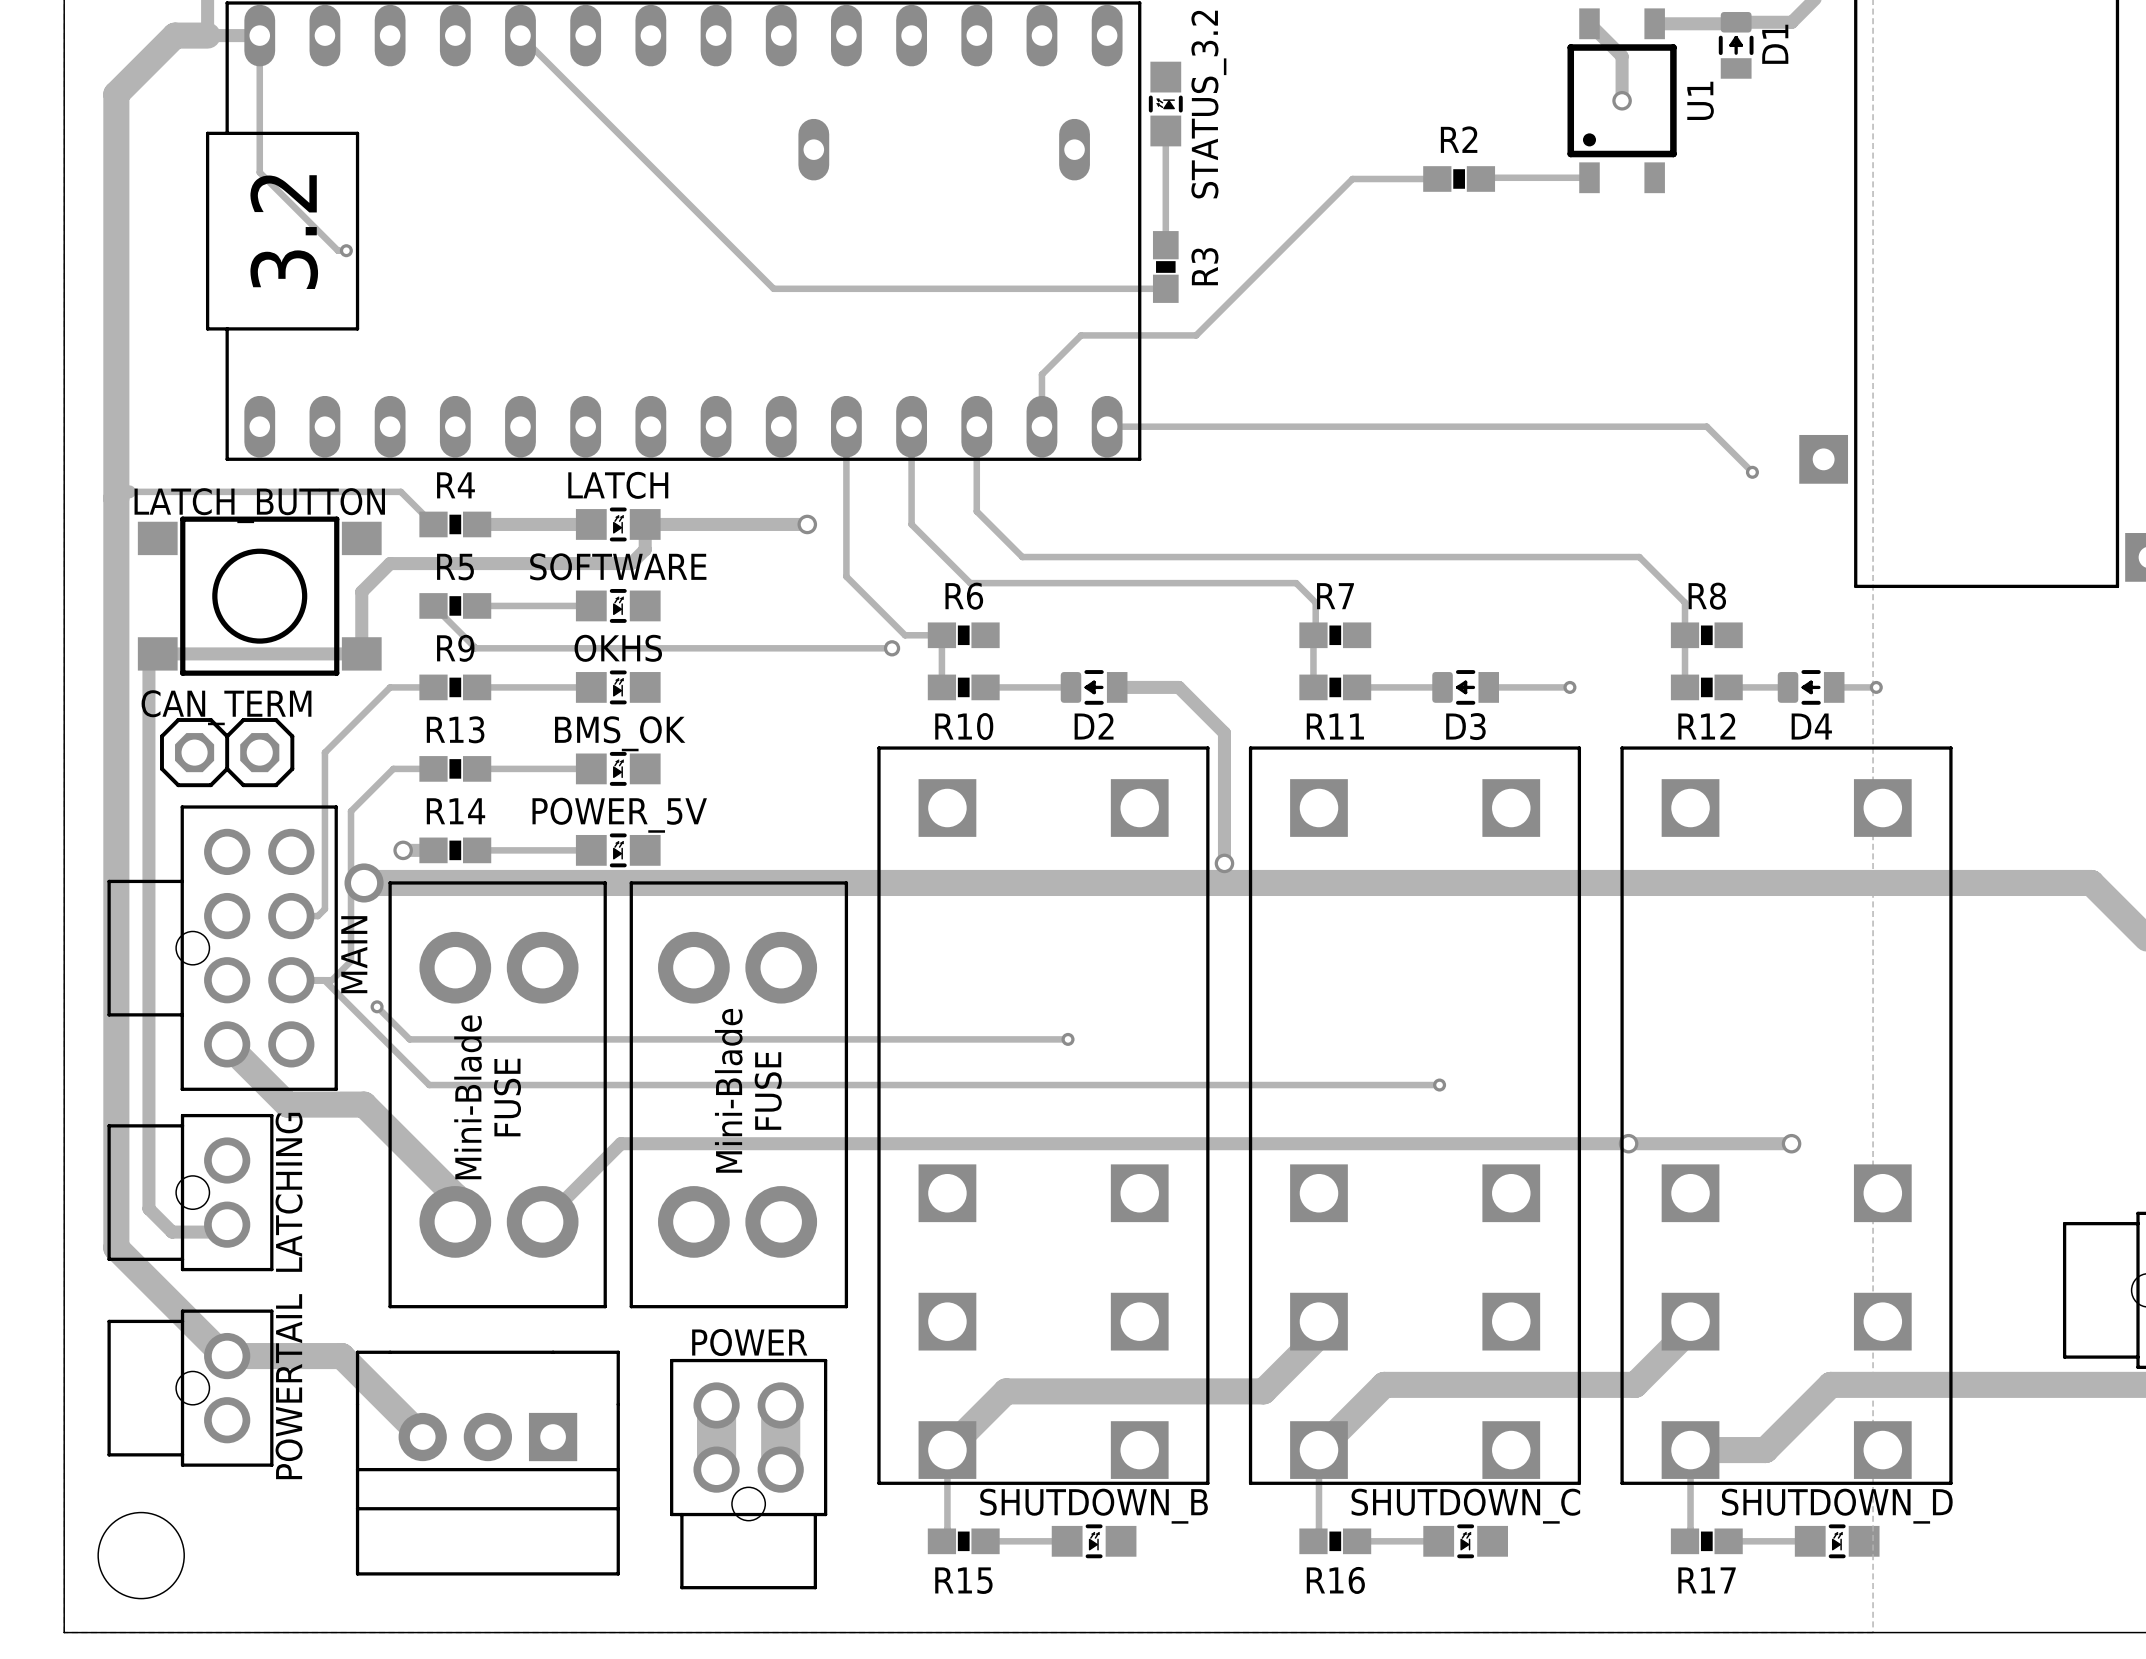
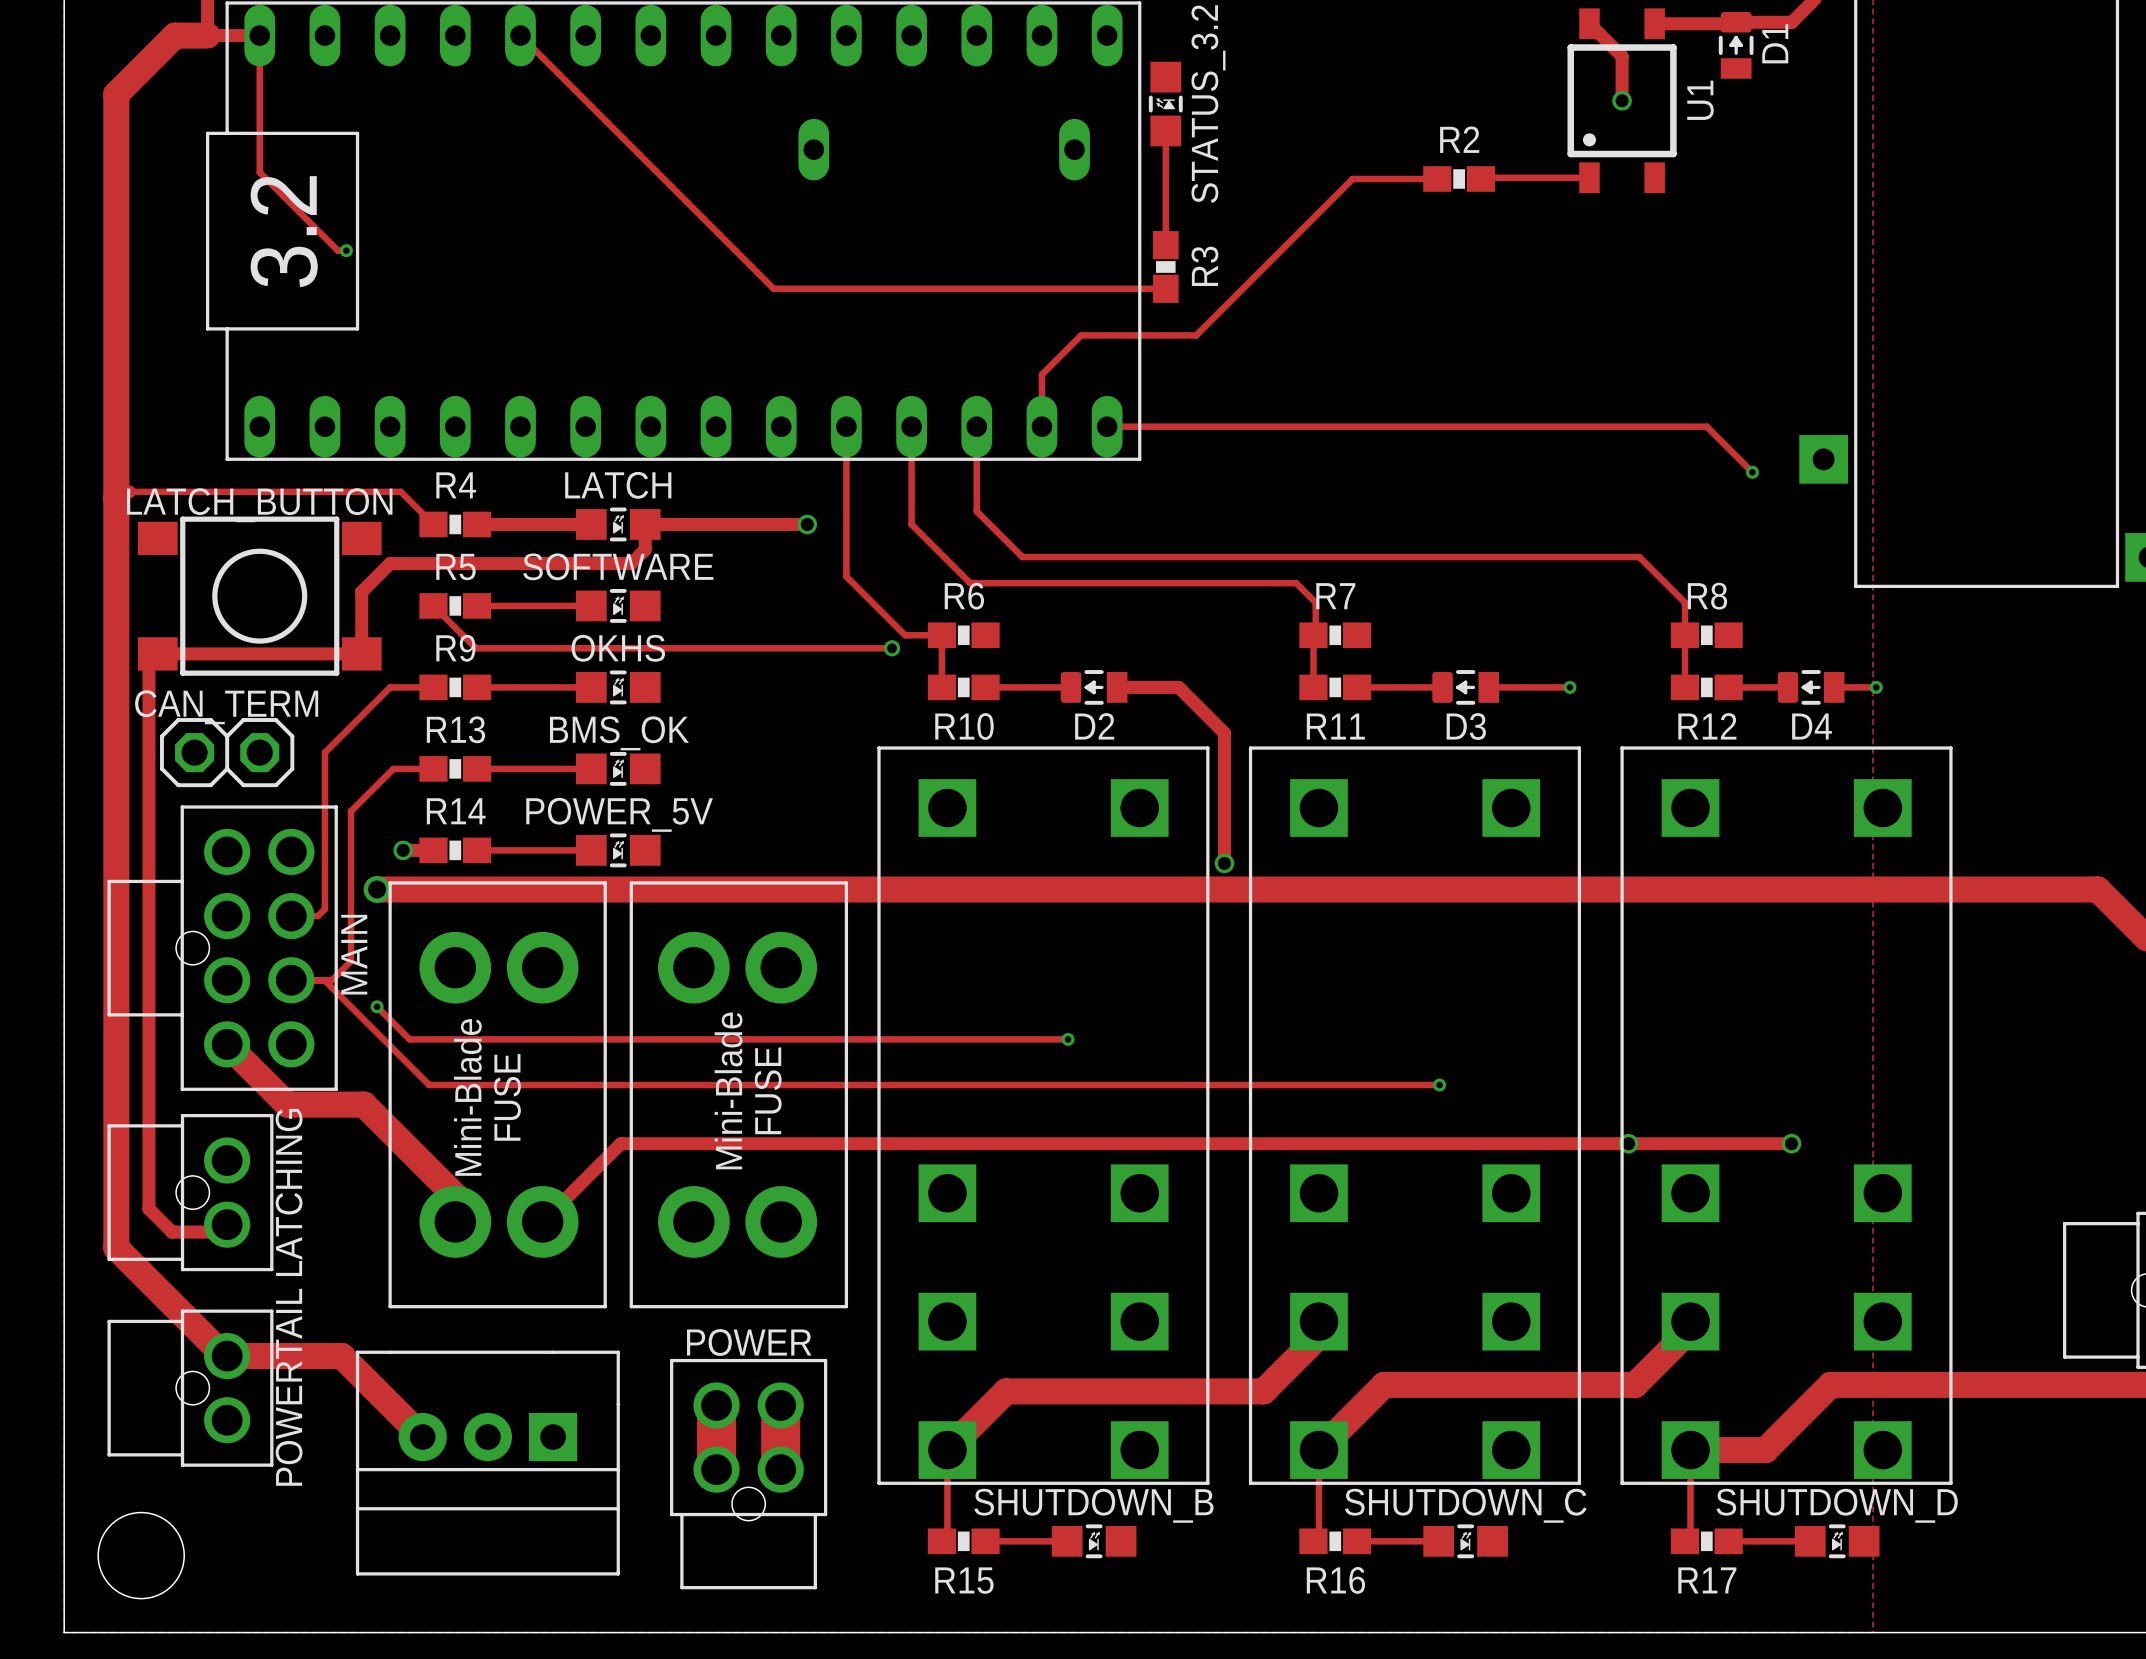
via size: [344, 863, 384, 903] -> [363, 876, 391, 903]
track: (364, 882) (2091, 882) (2097, 889) -> (377, 889) (2097, 889)

